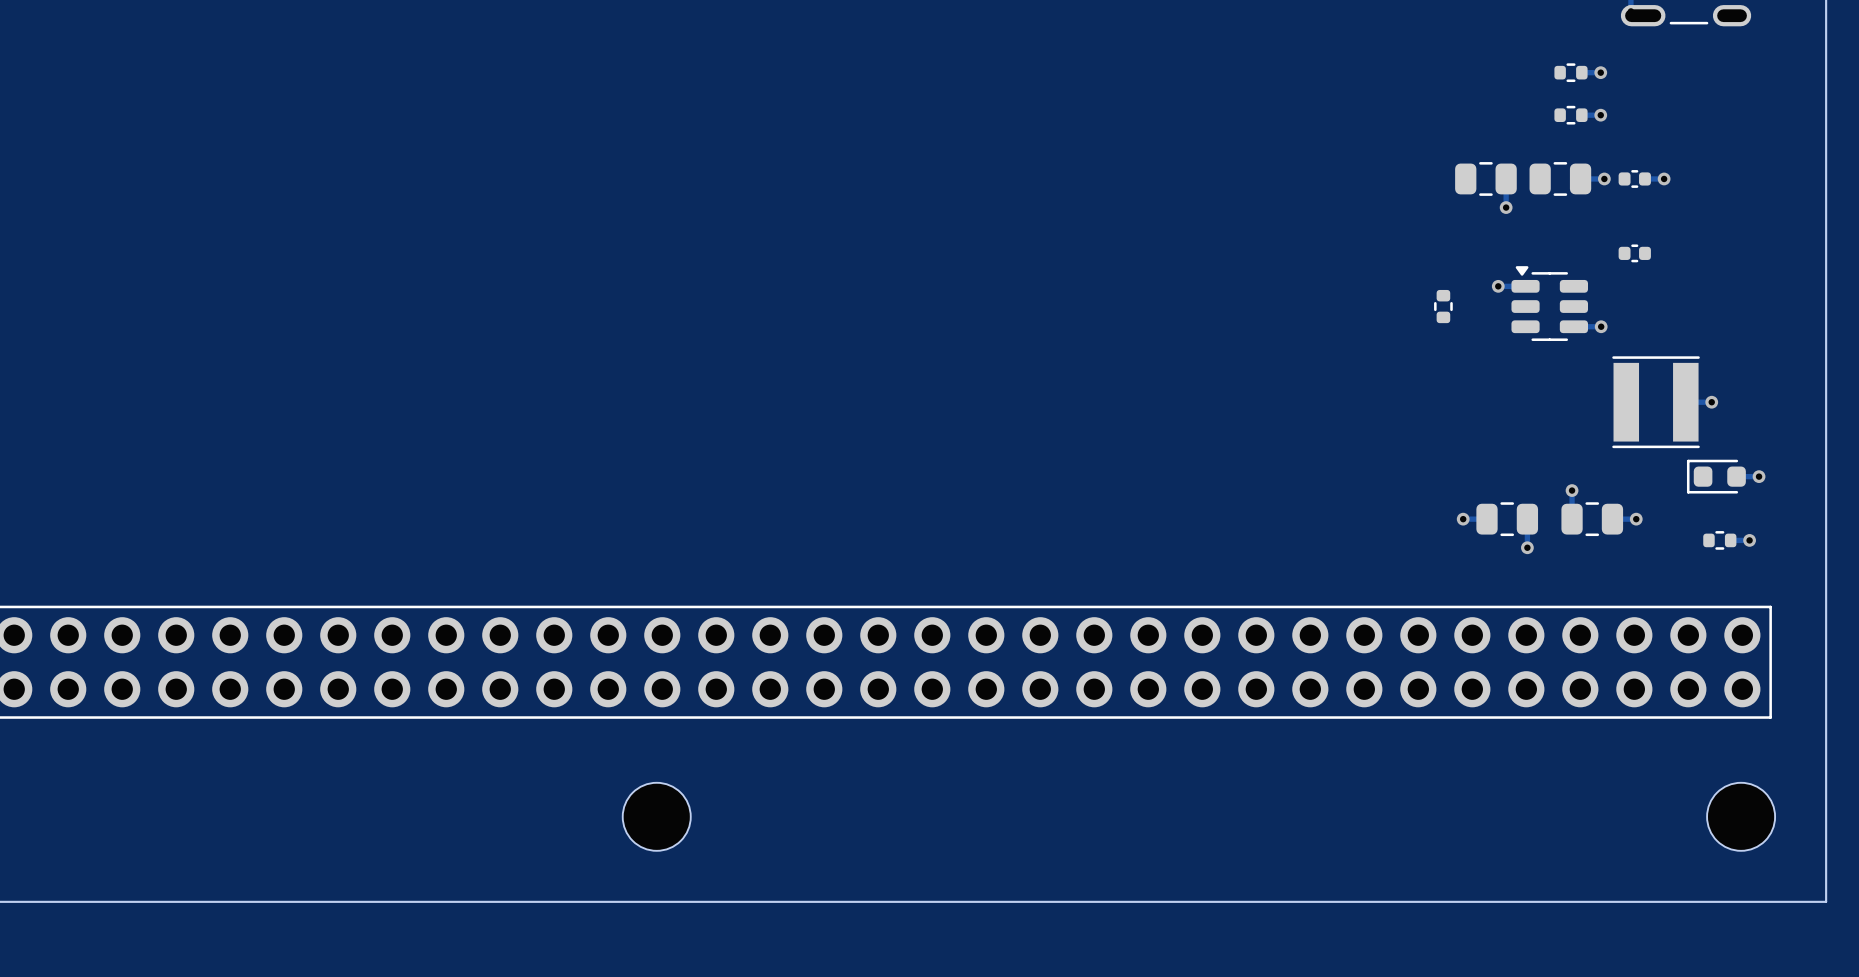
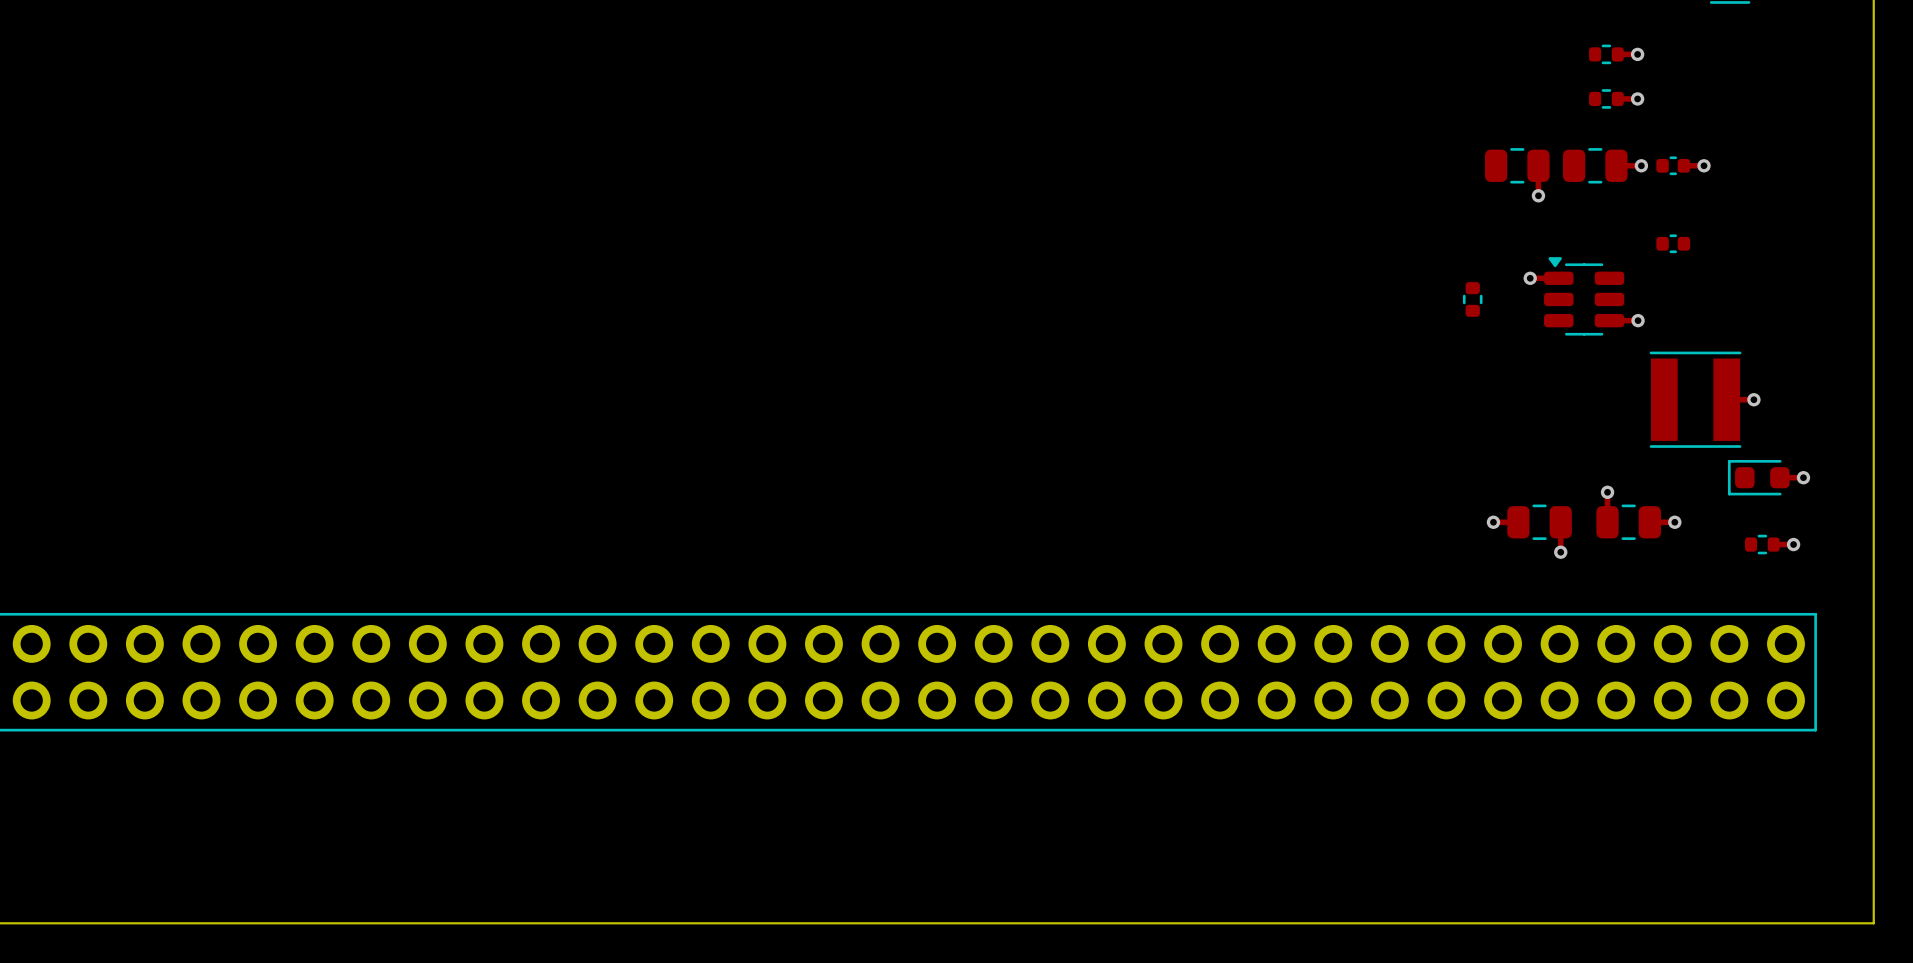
part: (656, 816) -> none
part: (1741, 816) -> none

